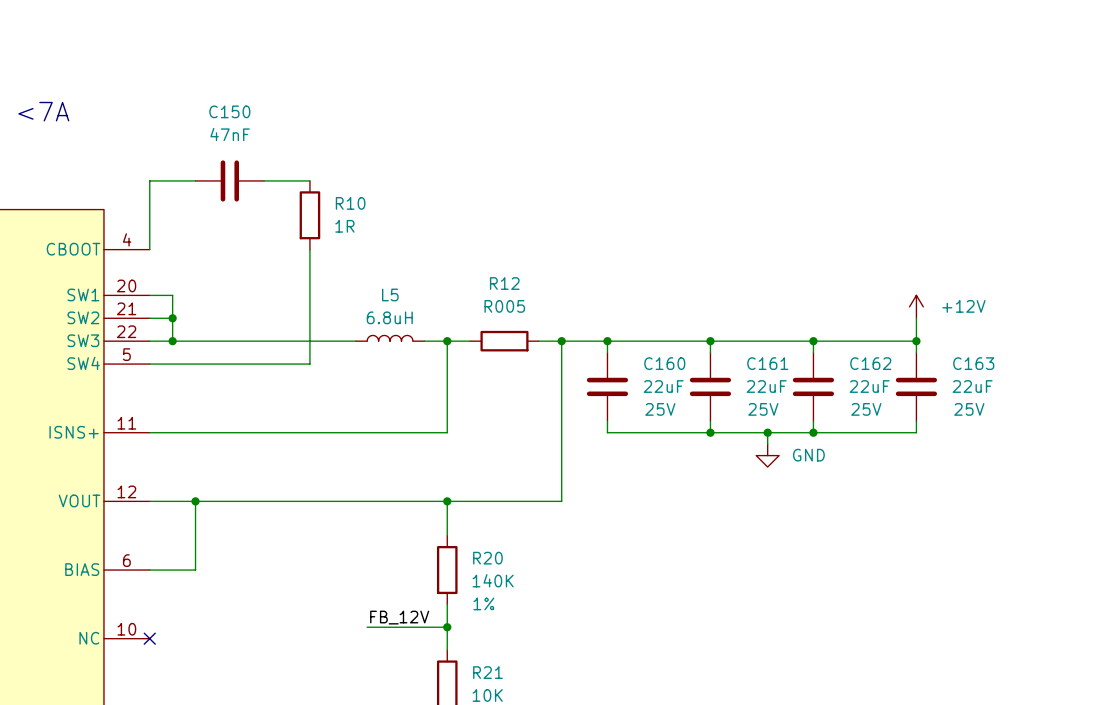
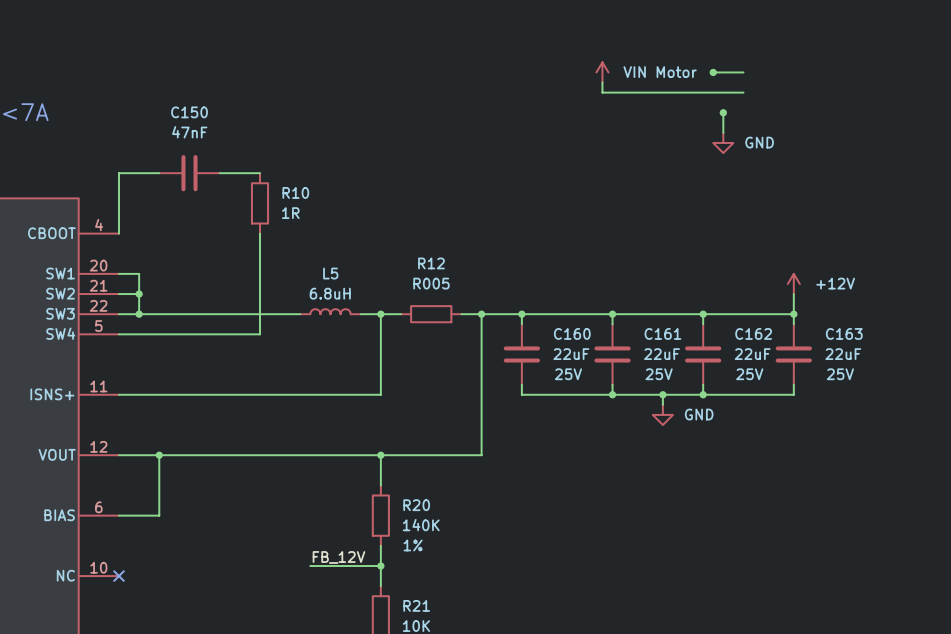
power symbol: none -> VIN Motor (602, 72)
wire: none -> (713, 72) (743, 72)
junction: none -> (713, 72)
wire: none -> (602, 82) (602, 92) (743, 92)
wire: none -> (723, 112) (723, 132)
junction: none -> (723, 112)
power symbol: none -> GND (723, 142)

